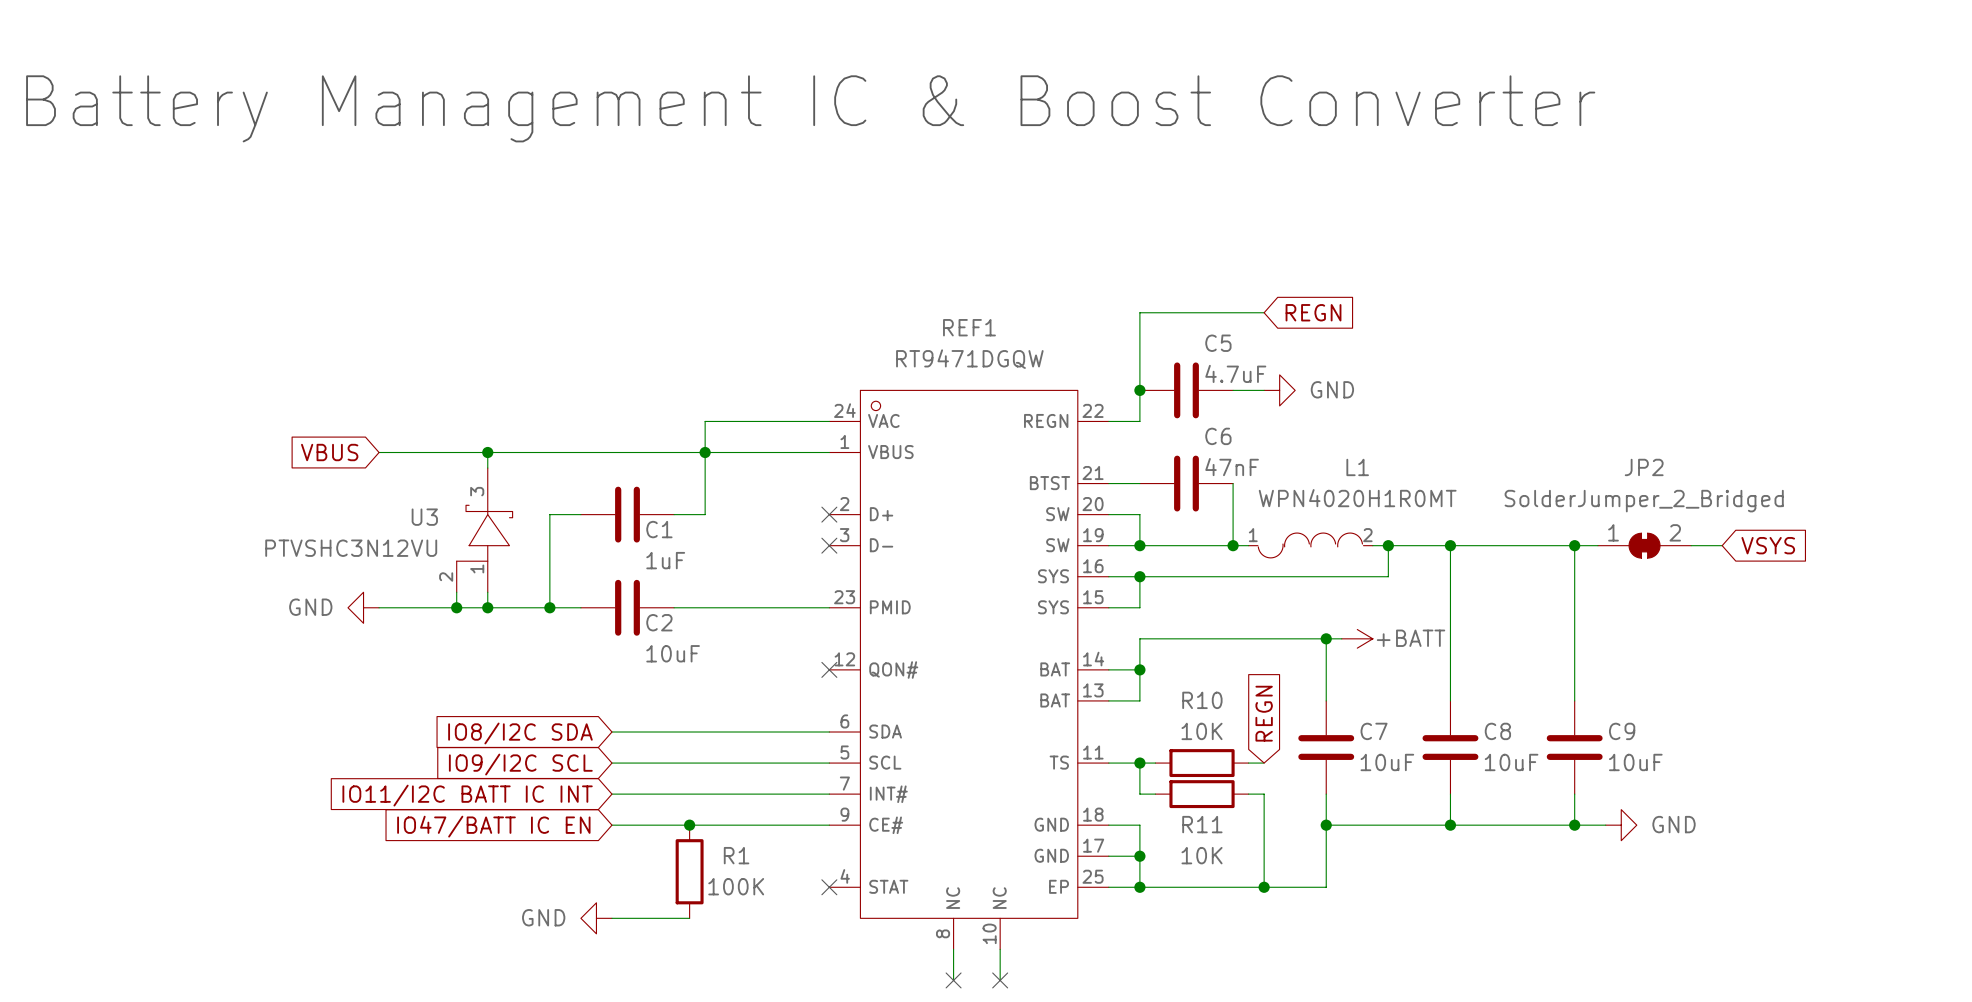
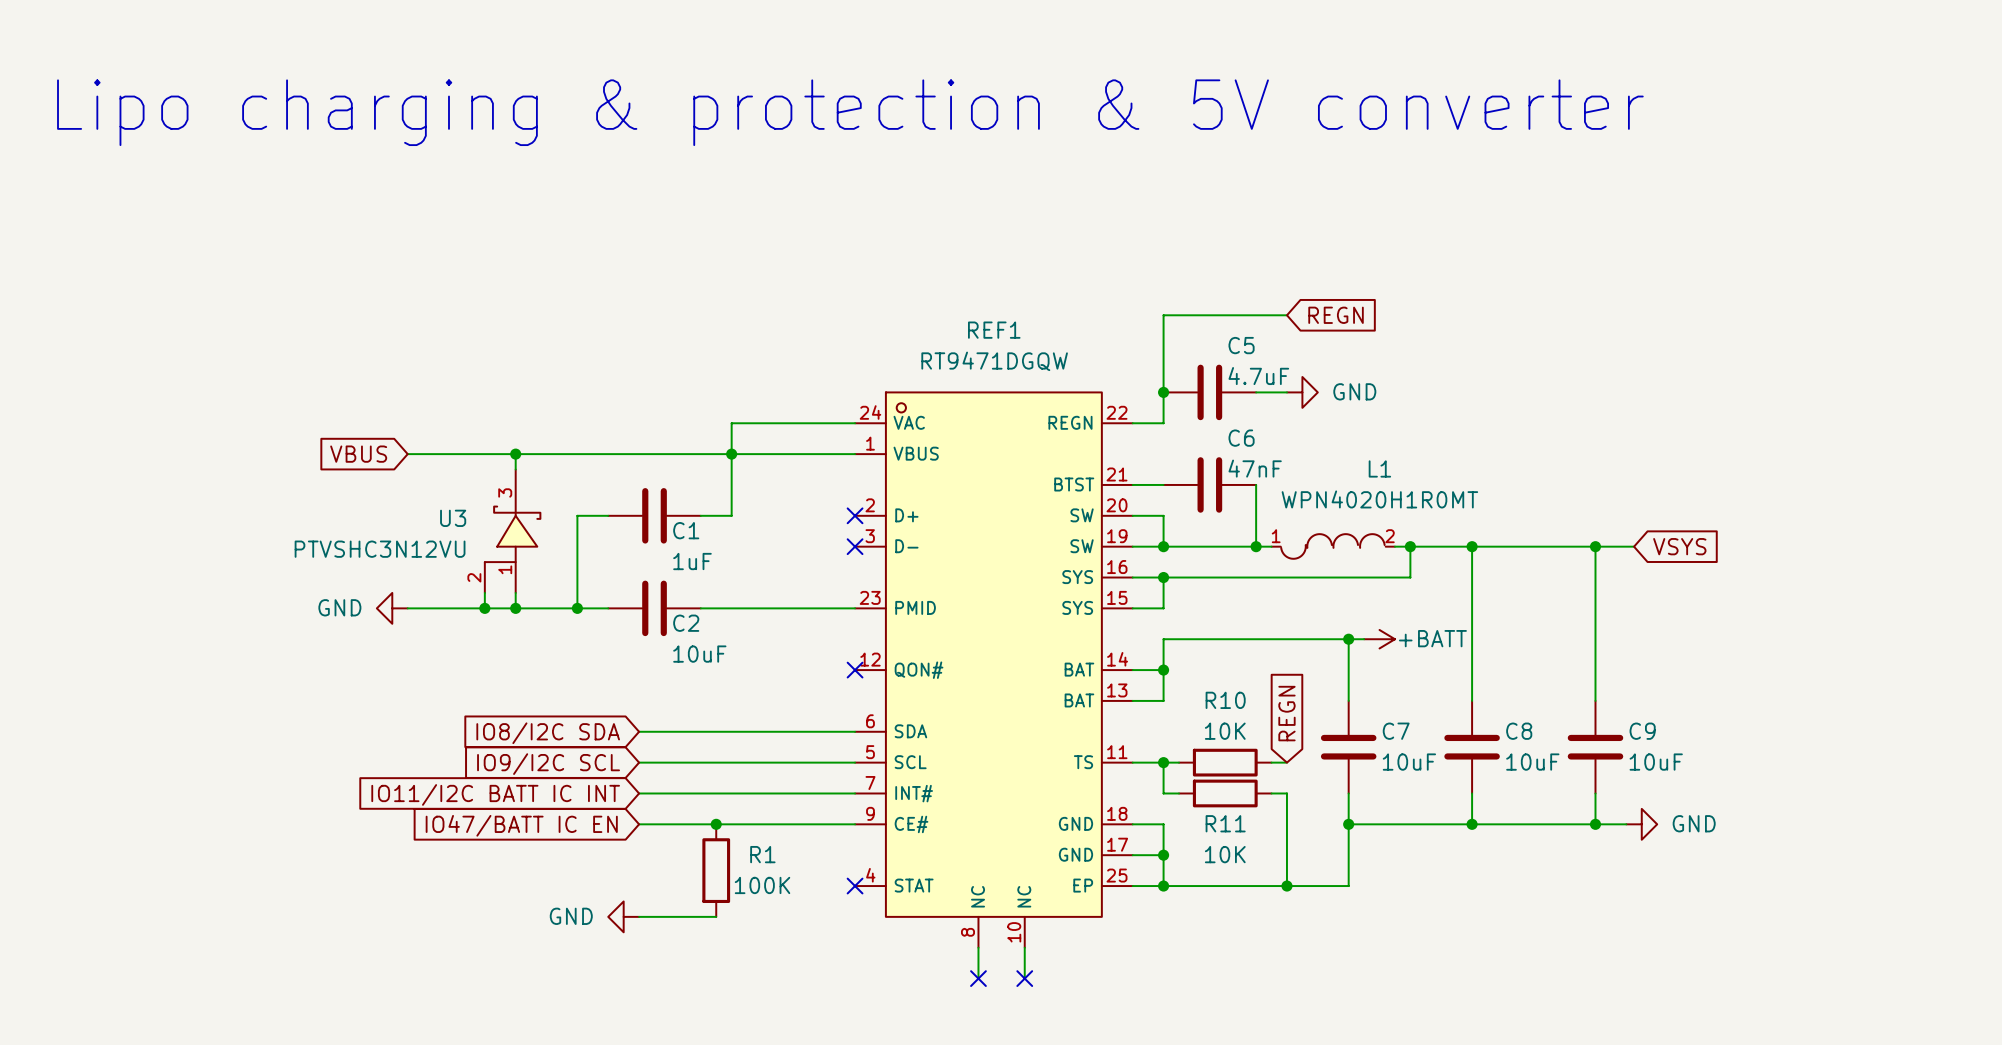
text: Battery Management IC & Boost Converter (810, 108) -> Lipo charging & protection & 5V converter (850, 112)
JP2: SolderJumper_2_Bridged (1644, 545) -> none
wire: (1691, 545) (1722, 545) -> none
global label position: VSYS (1768, 545) -> VSYS (1679, 546)

